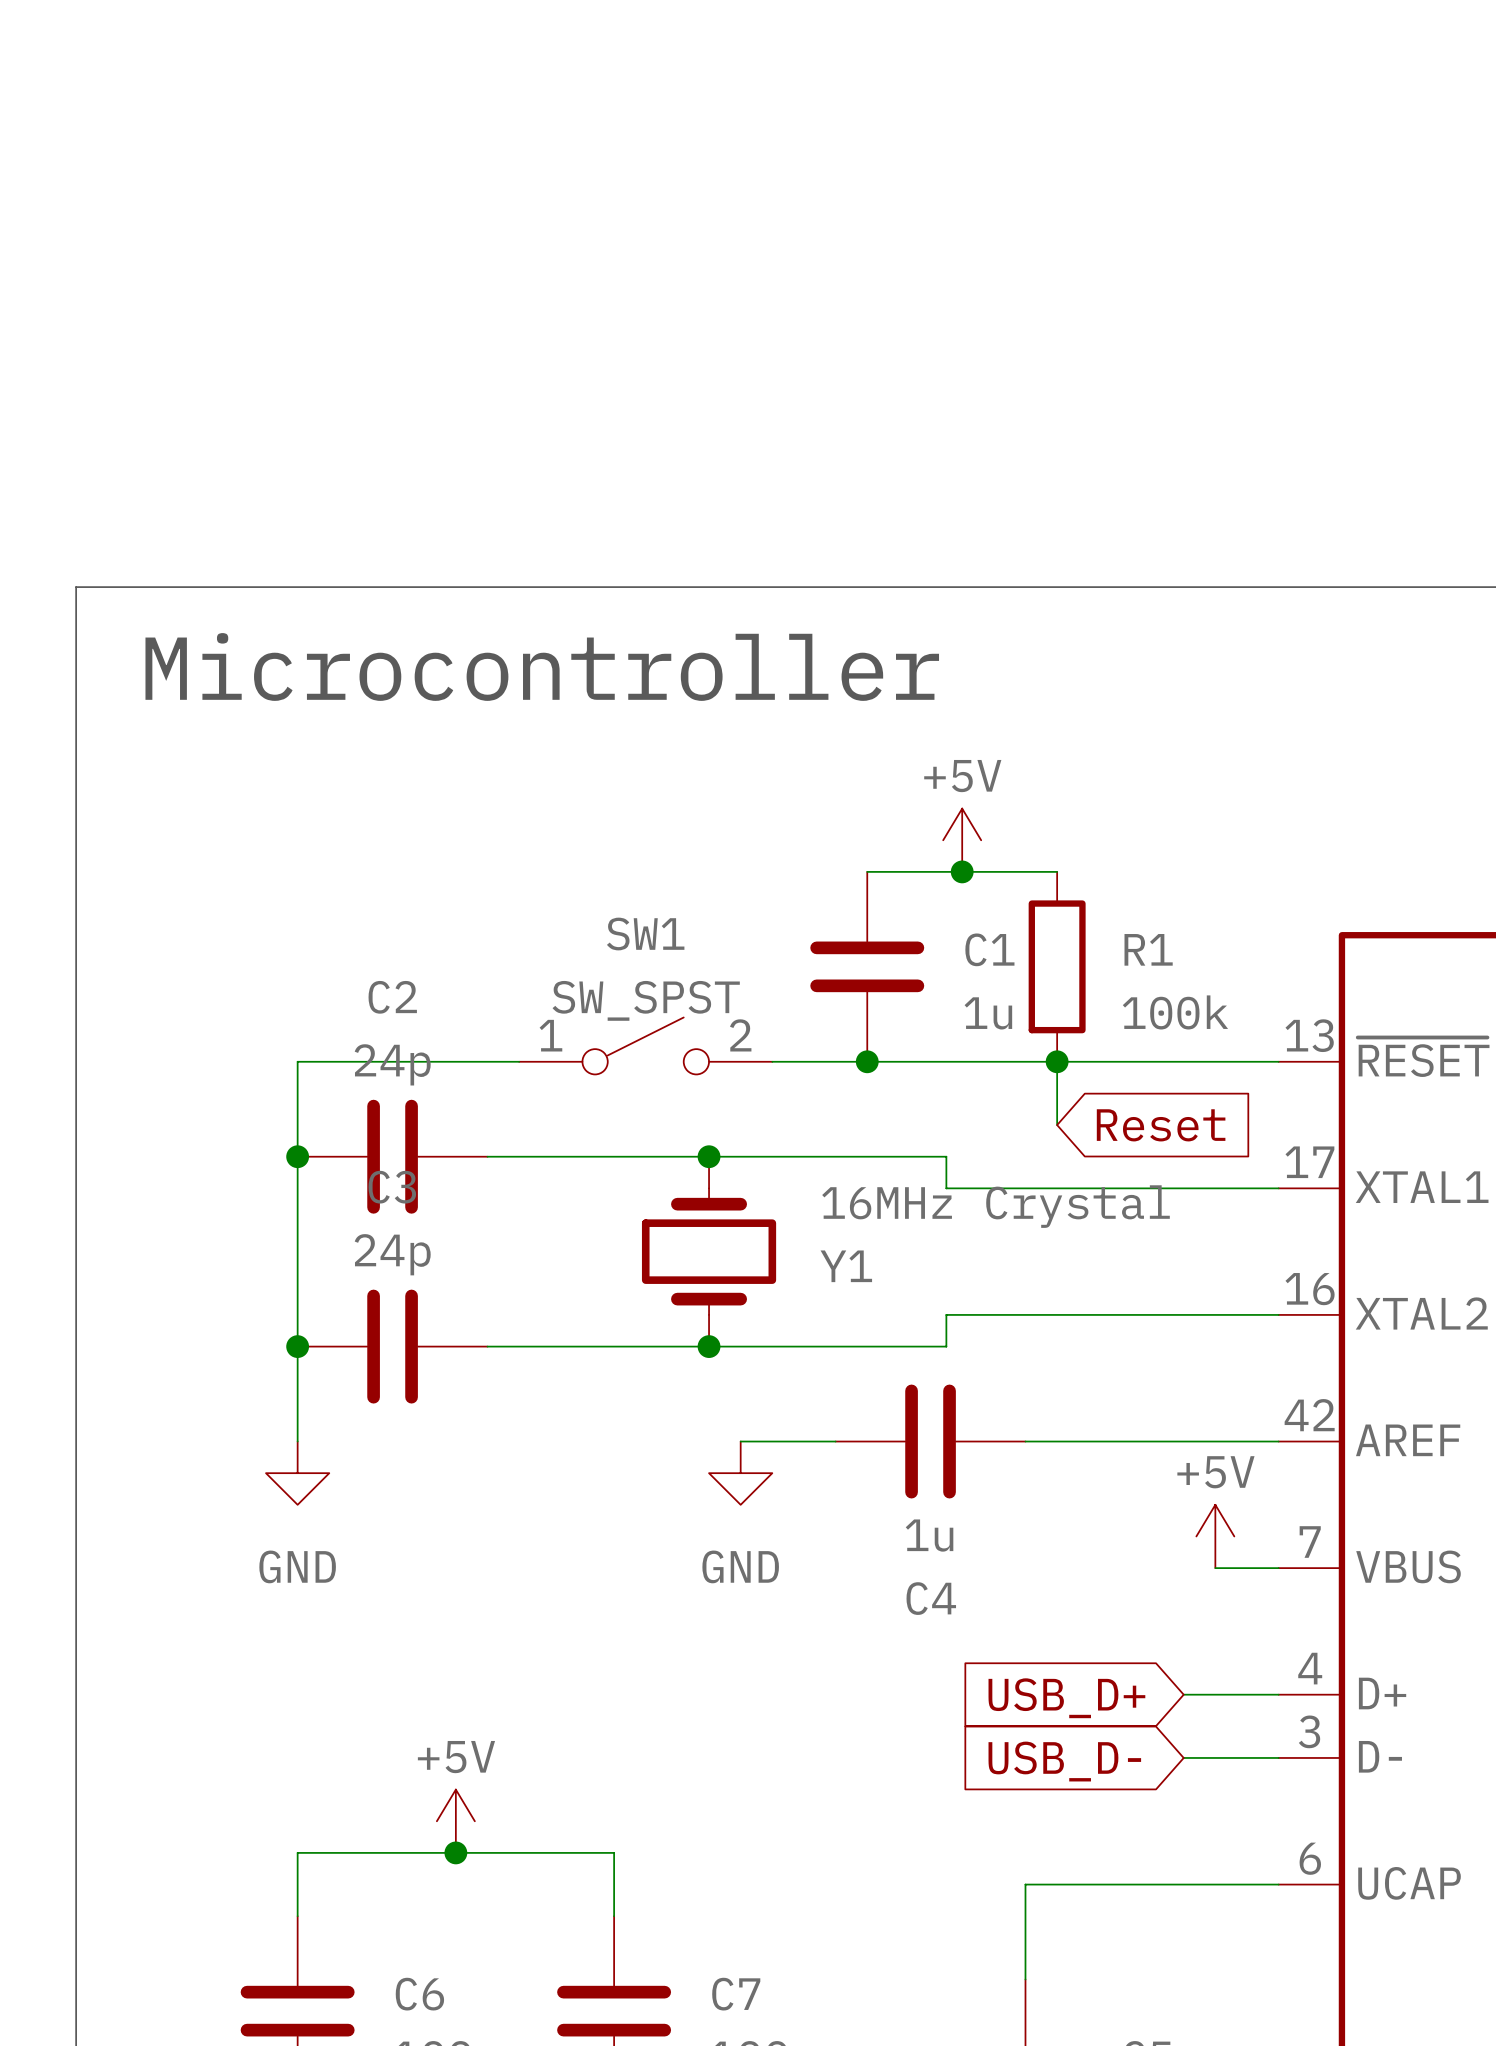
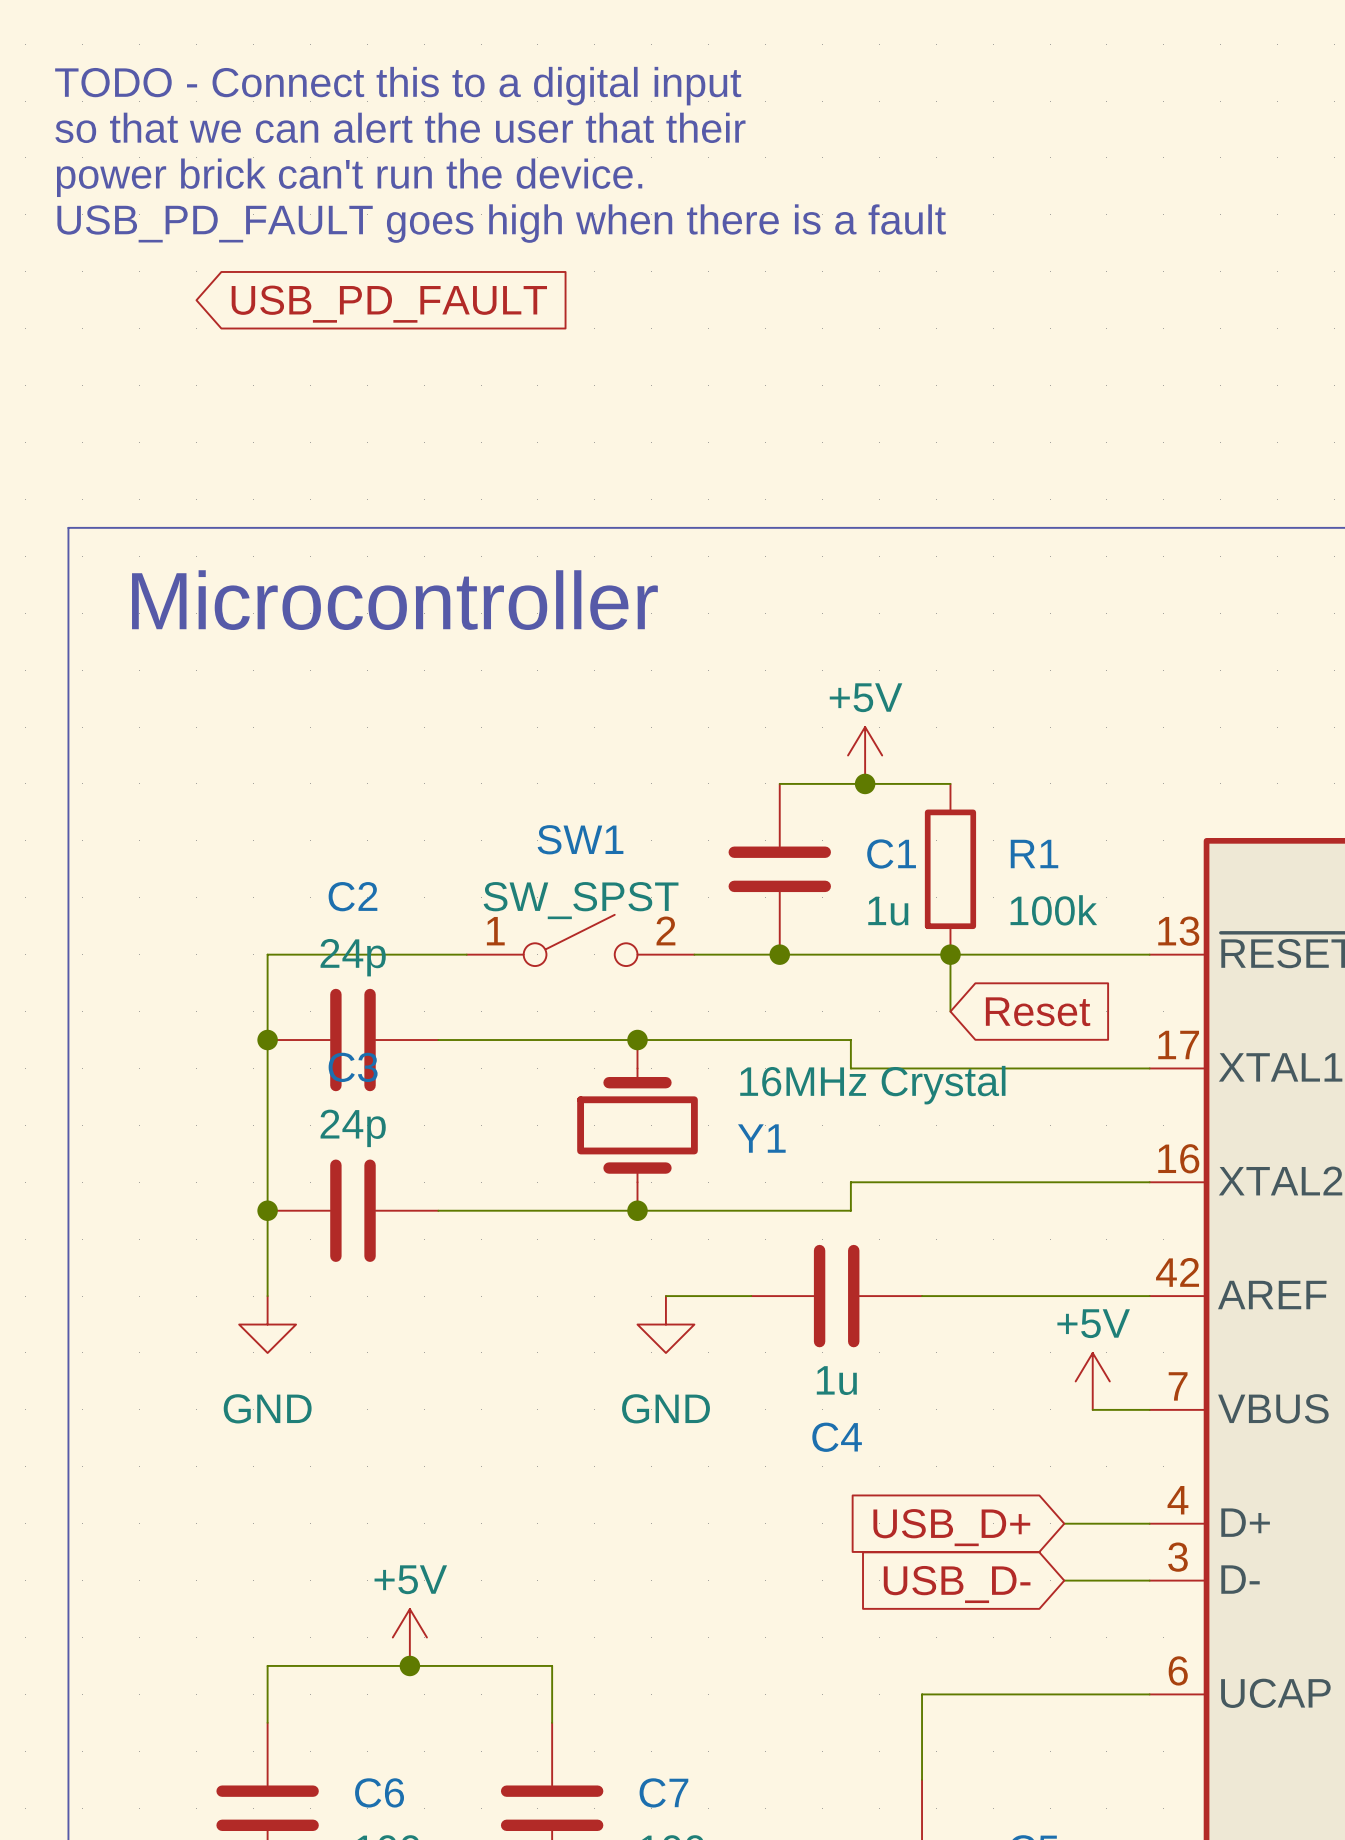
text: none -> TODO - Connect this to a digital input (398, 86)
text: none -> so that we can alert the user that their (400, 127)
text: none -> power brick can't run the device. (349, 177)
text: none -> USB_PD_FAULT goes high when there is a fault (501, 223)
global label: none -> USB_PD_FAULT (389, 304)

